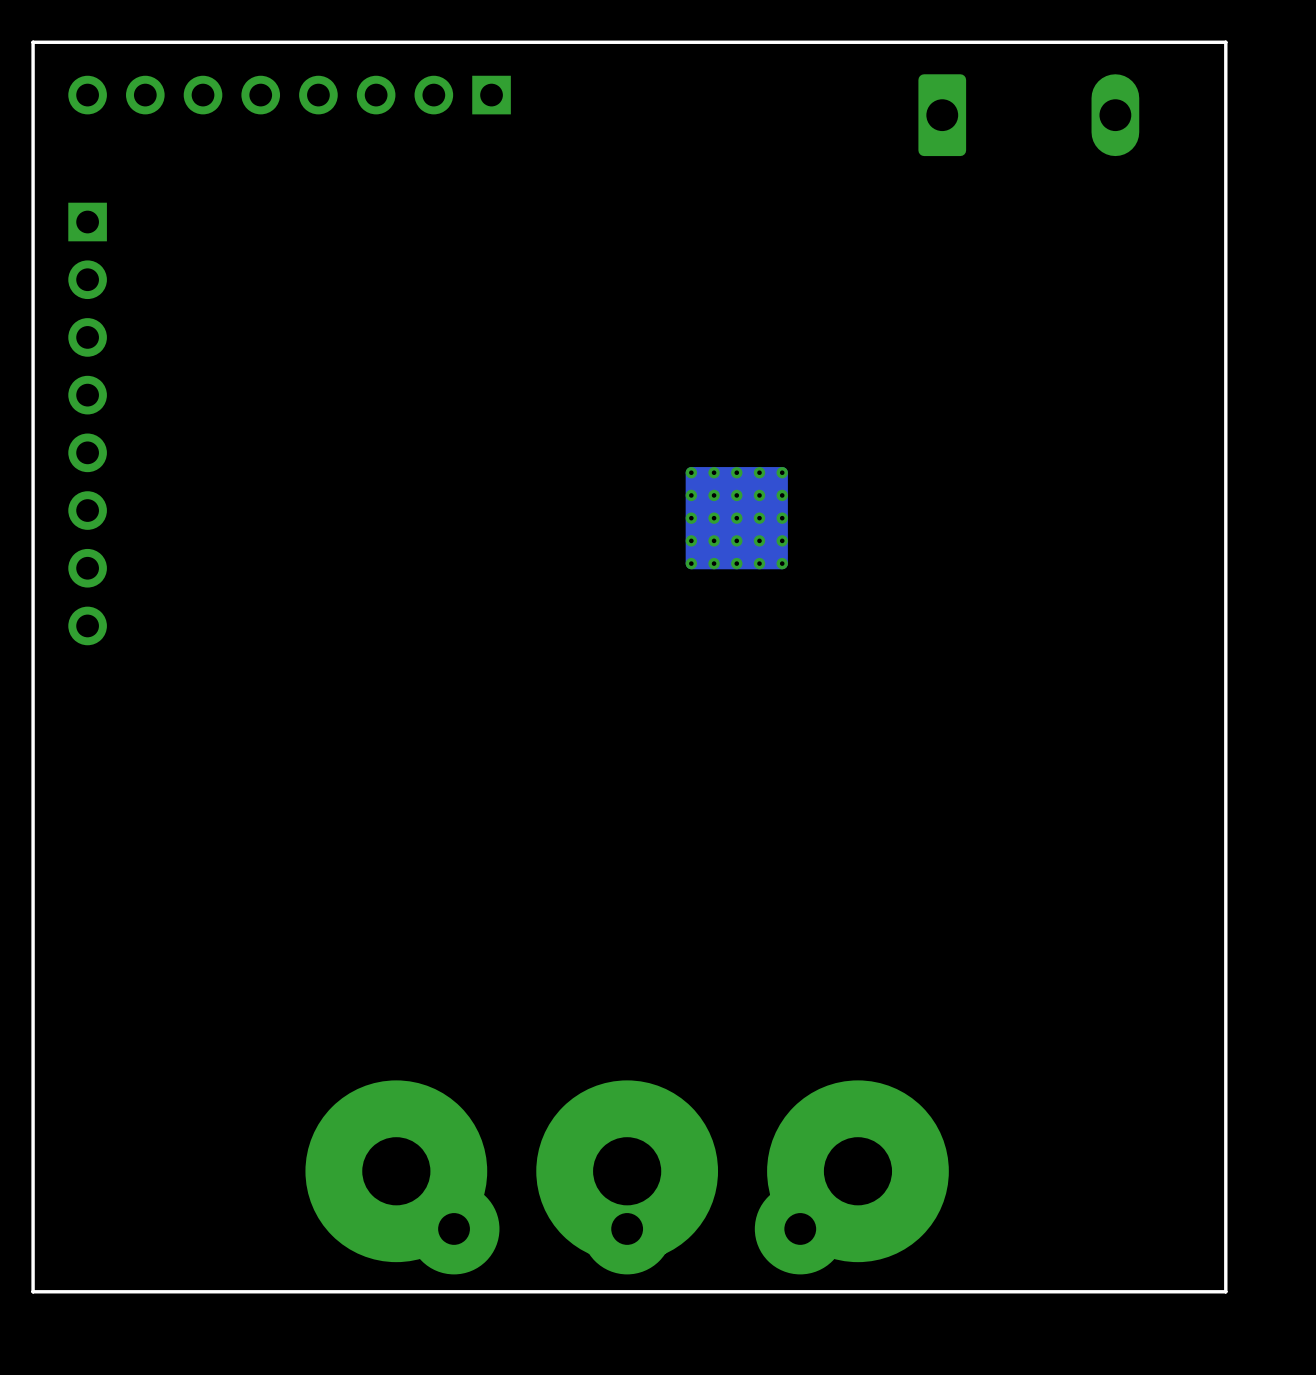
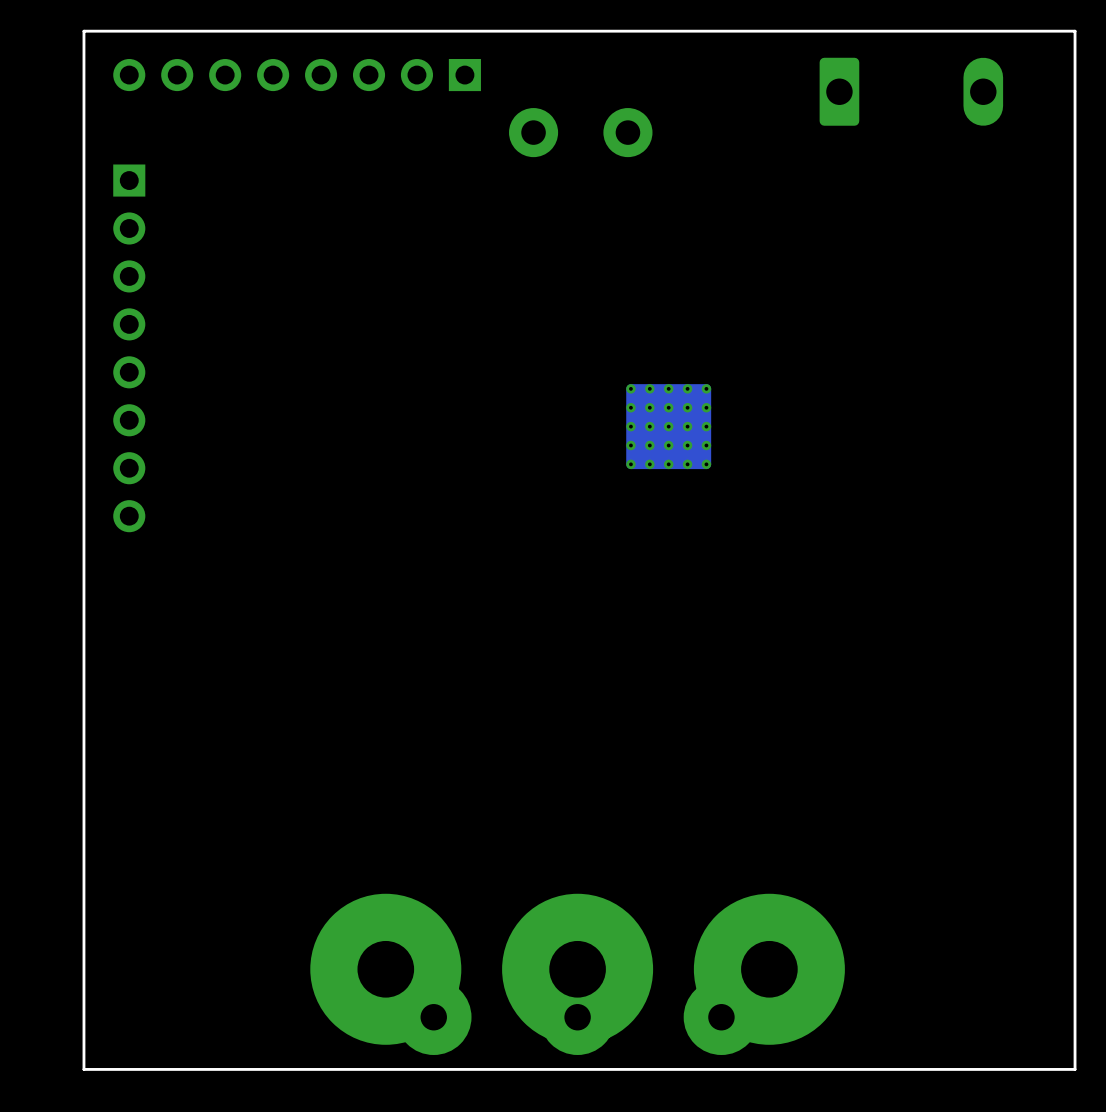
part: none -> (580, 132)

